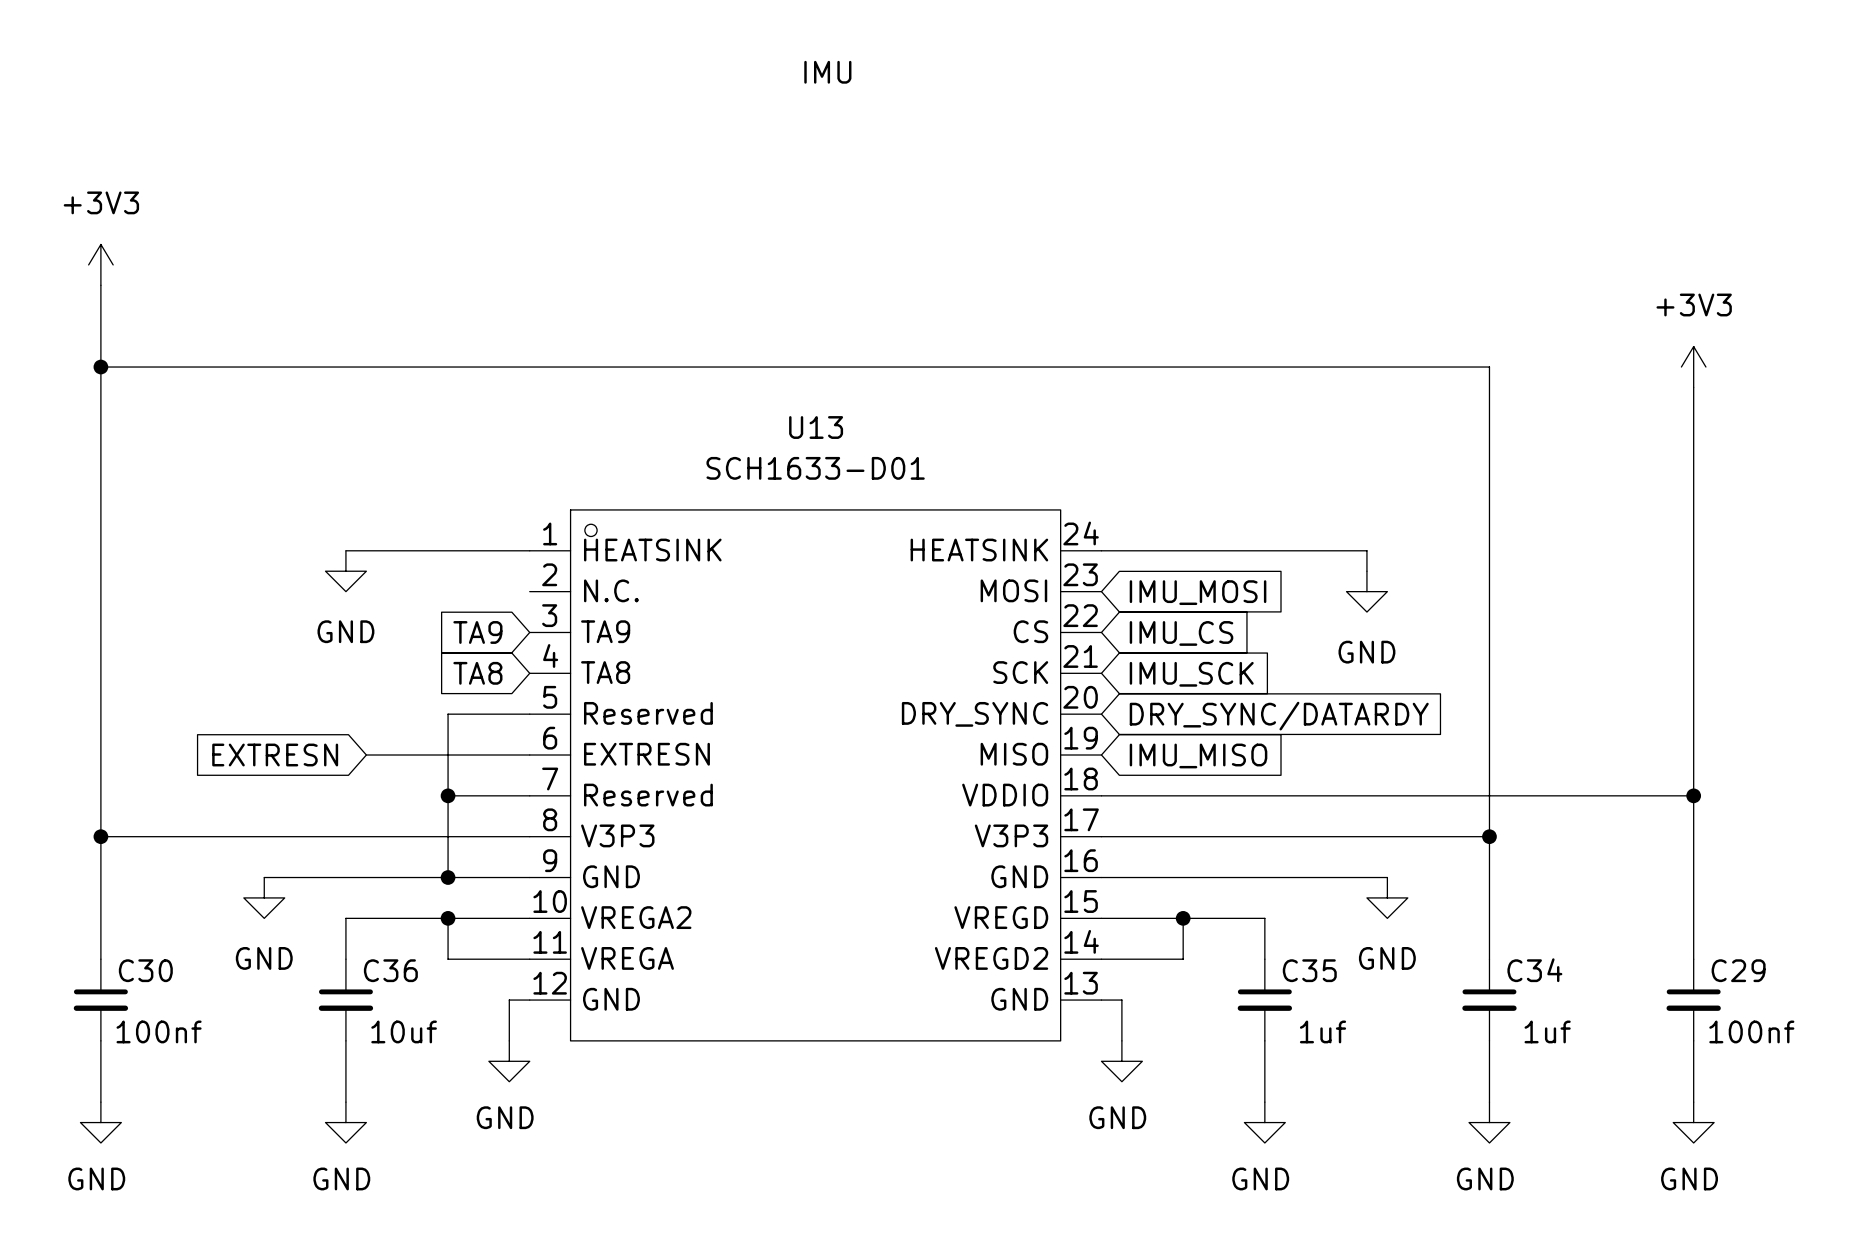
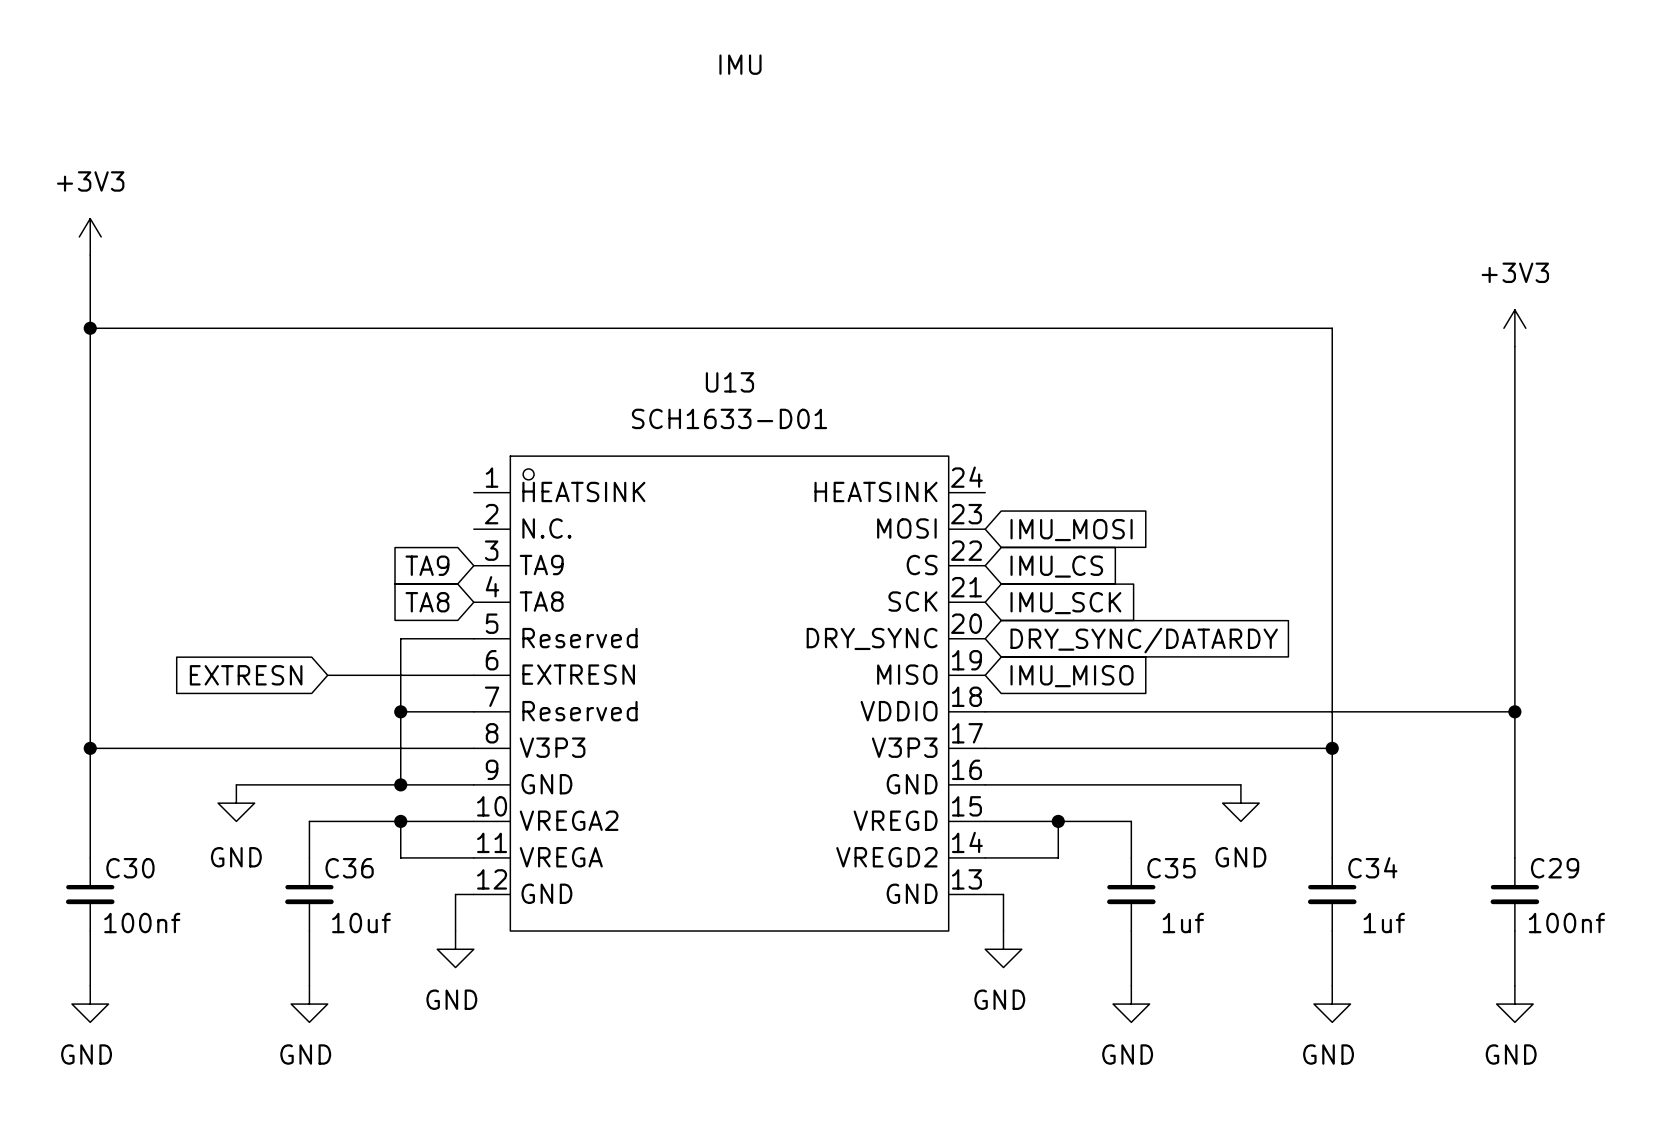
wire: (345, 550) (529, 550) -> none
wire: (1101, 550) (1366, 550) (1366, 571) -> none
power symbol: GND (345, 571) -> none
power symbol: GND (1366, 591) -> none

